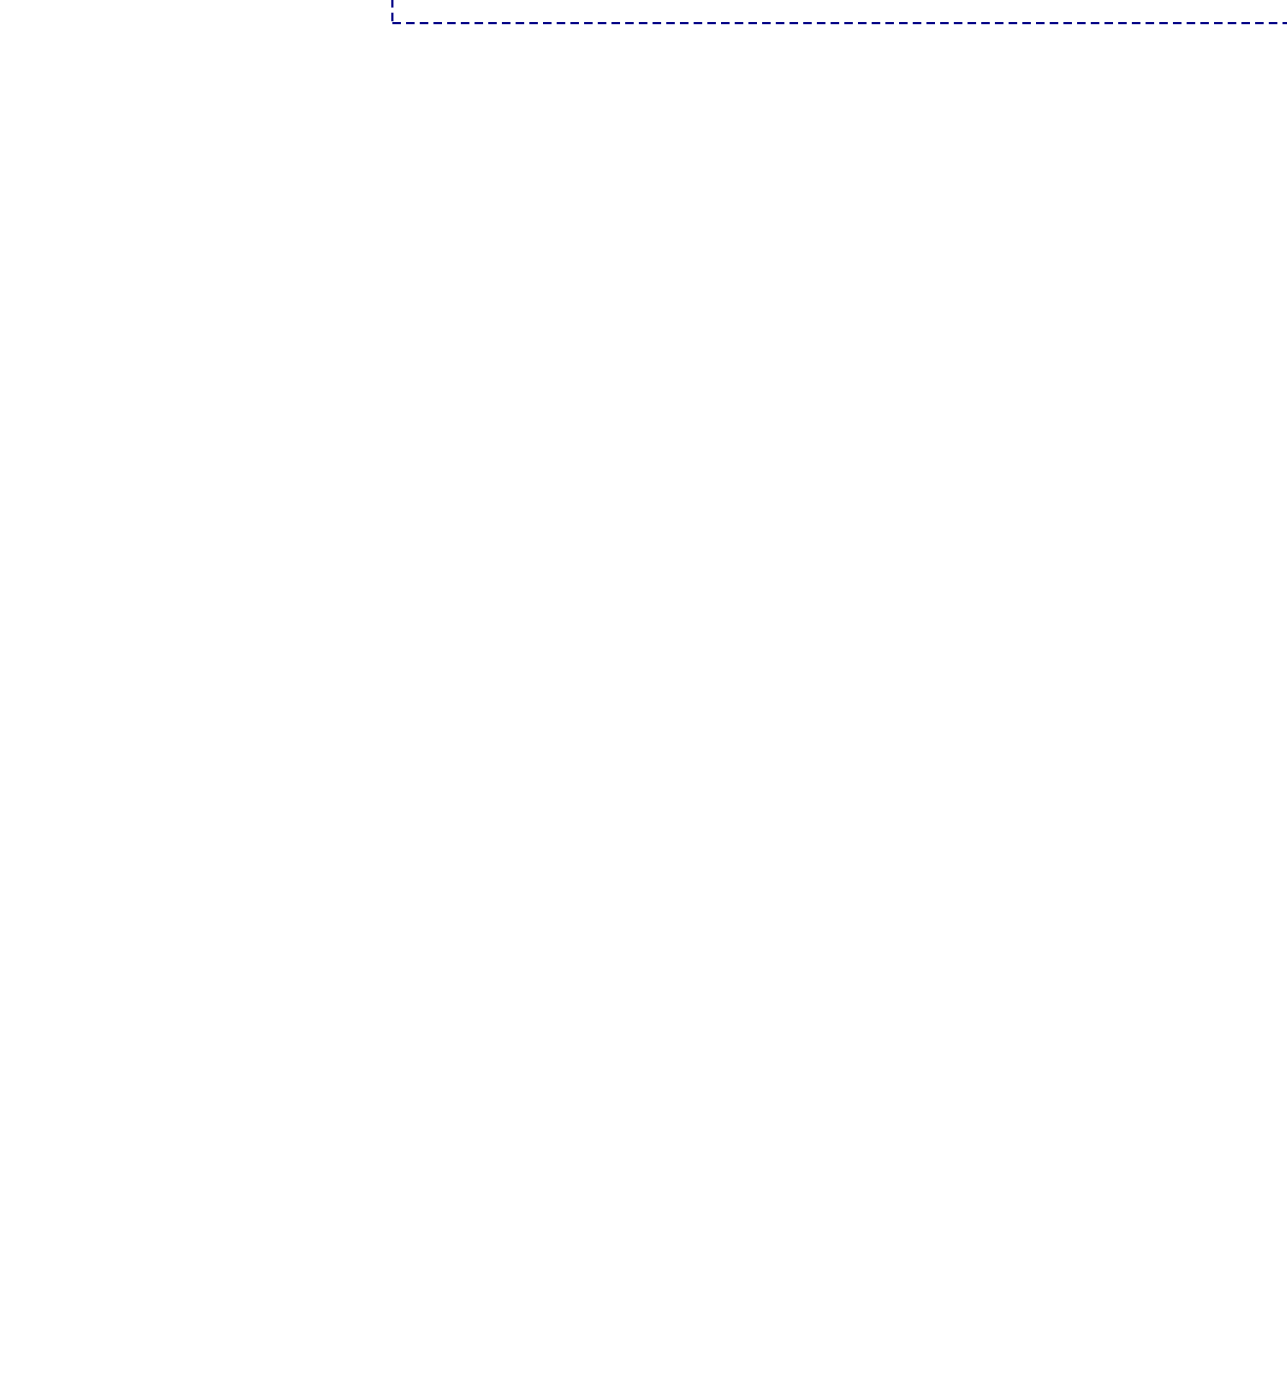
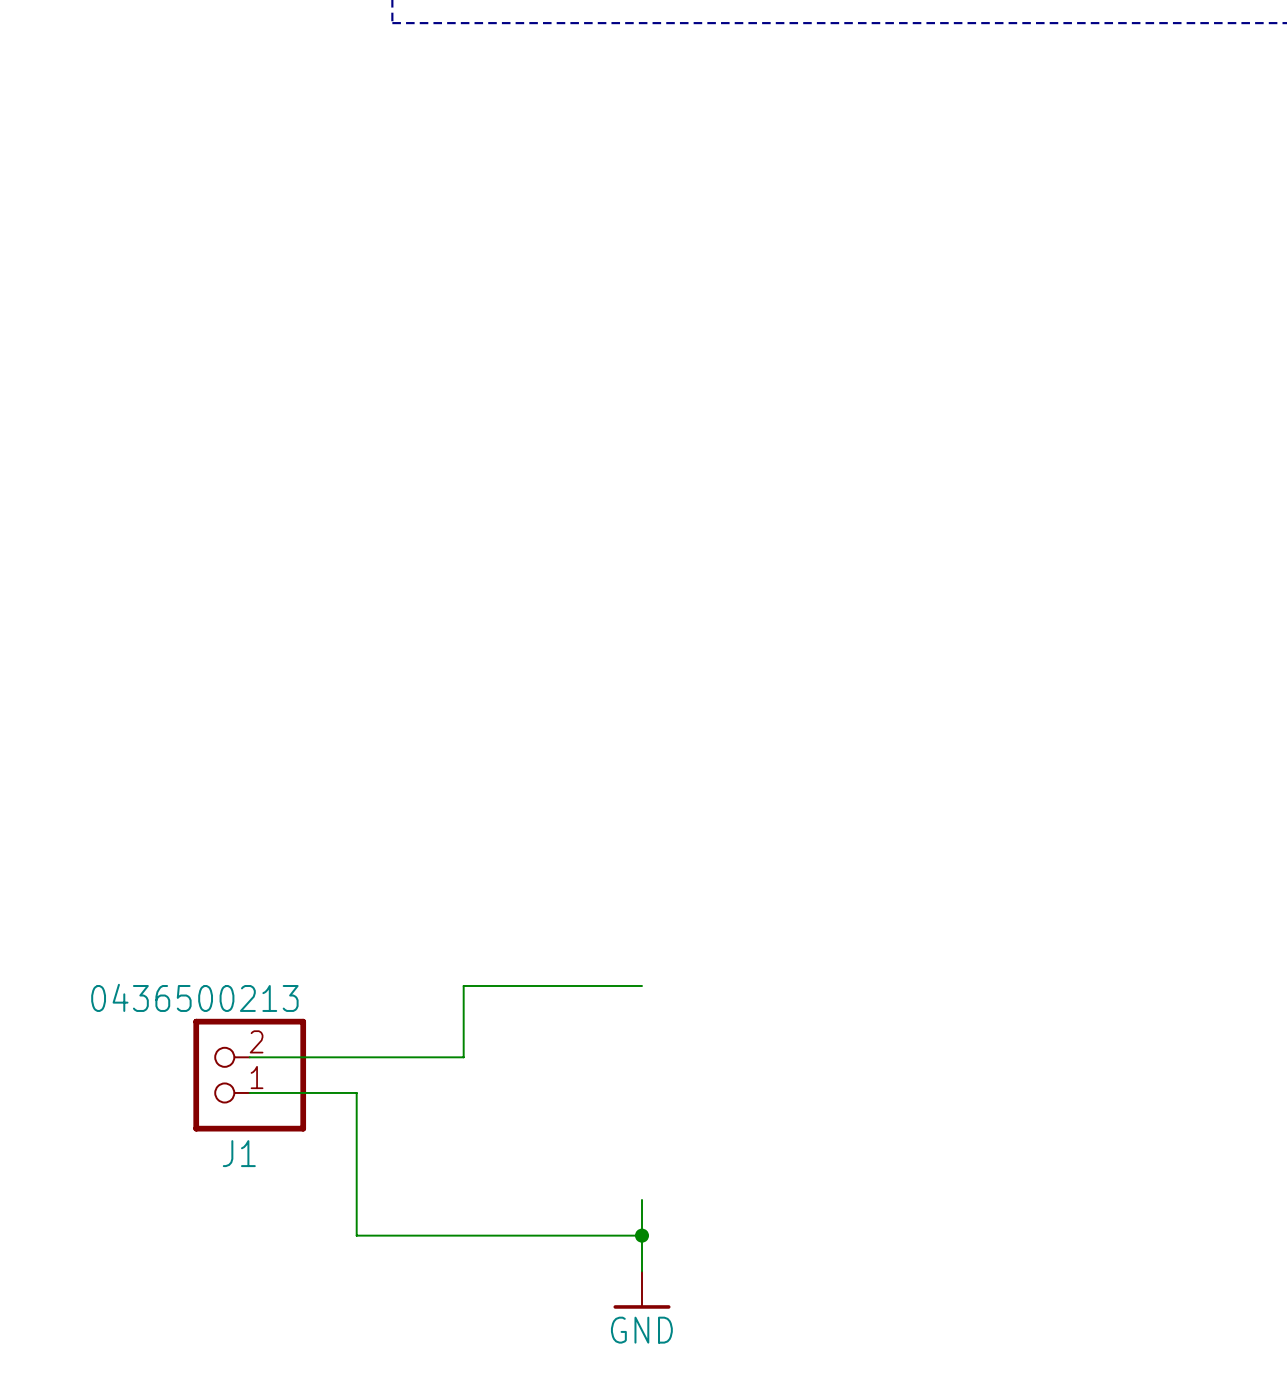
wire: none -> (642, 985) (463, 985) (463, 1057) (249, 1057)
J1: none -> 0436500213 (249, 1075)
wire: none -> (249, 1092) (356, 1092) (356, 1235) (642, 1235)
wire: none -> (642, 1199) (642, 1271)
junction: none -> (642, 1235)
power symbol: none -> GND (642, 1290)

